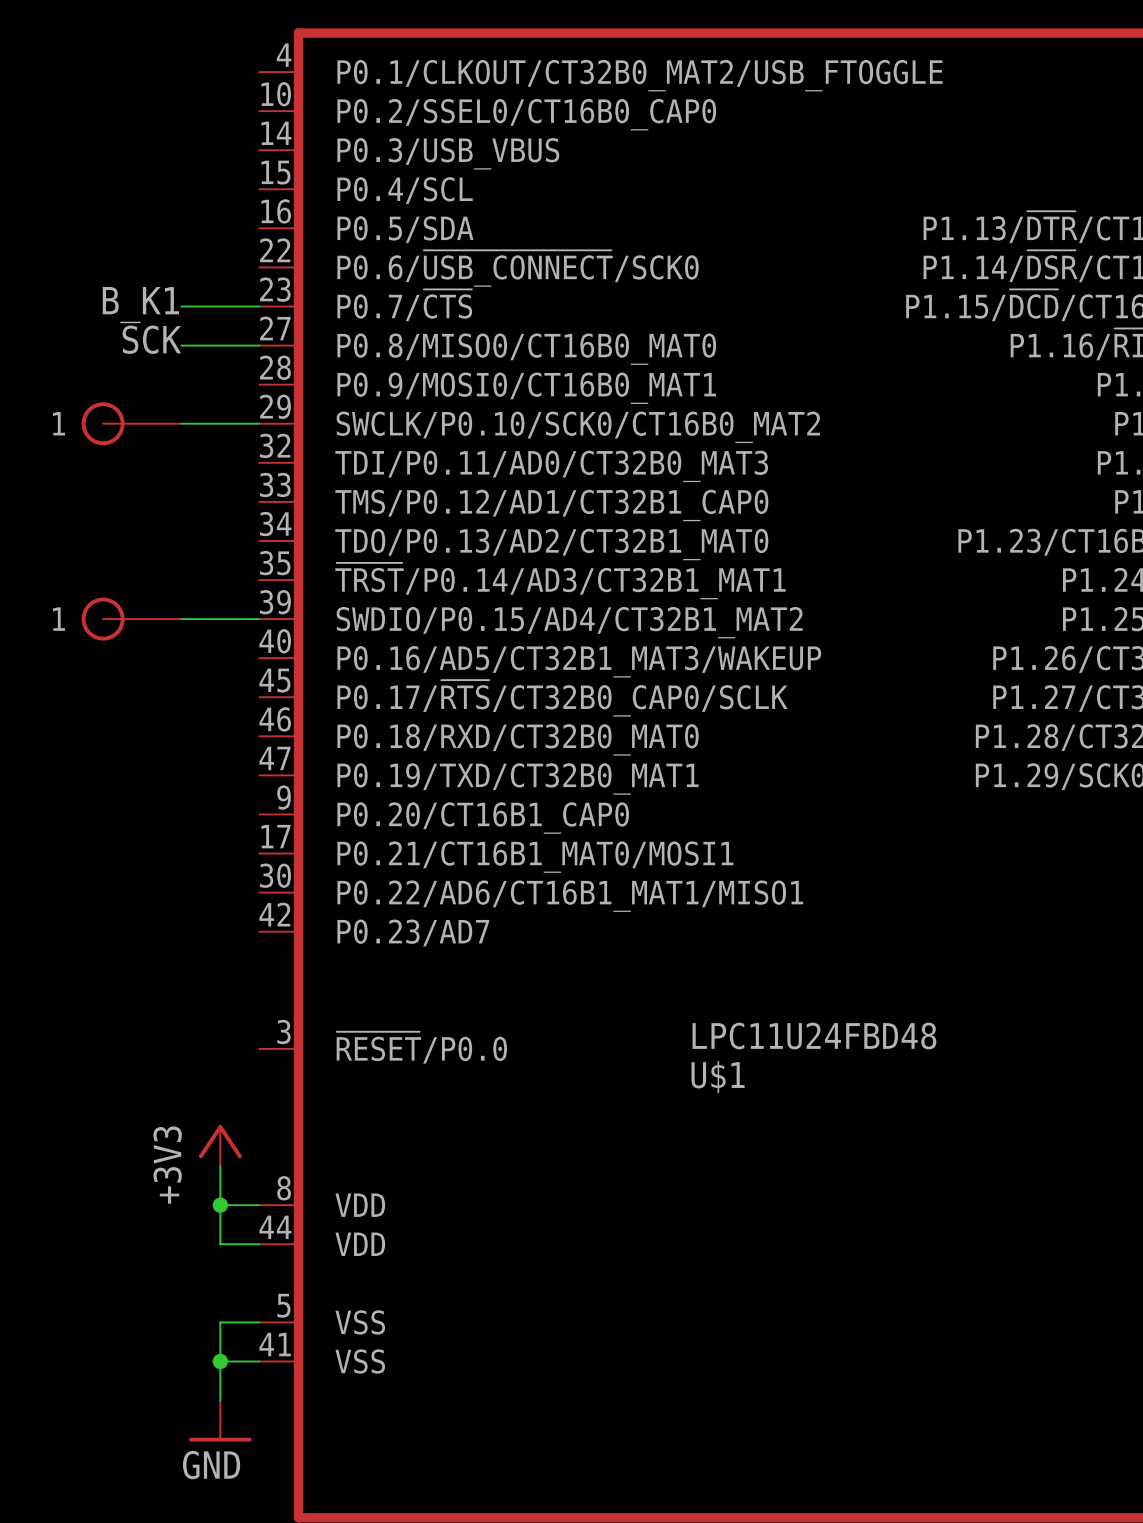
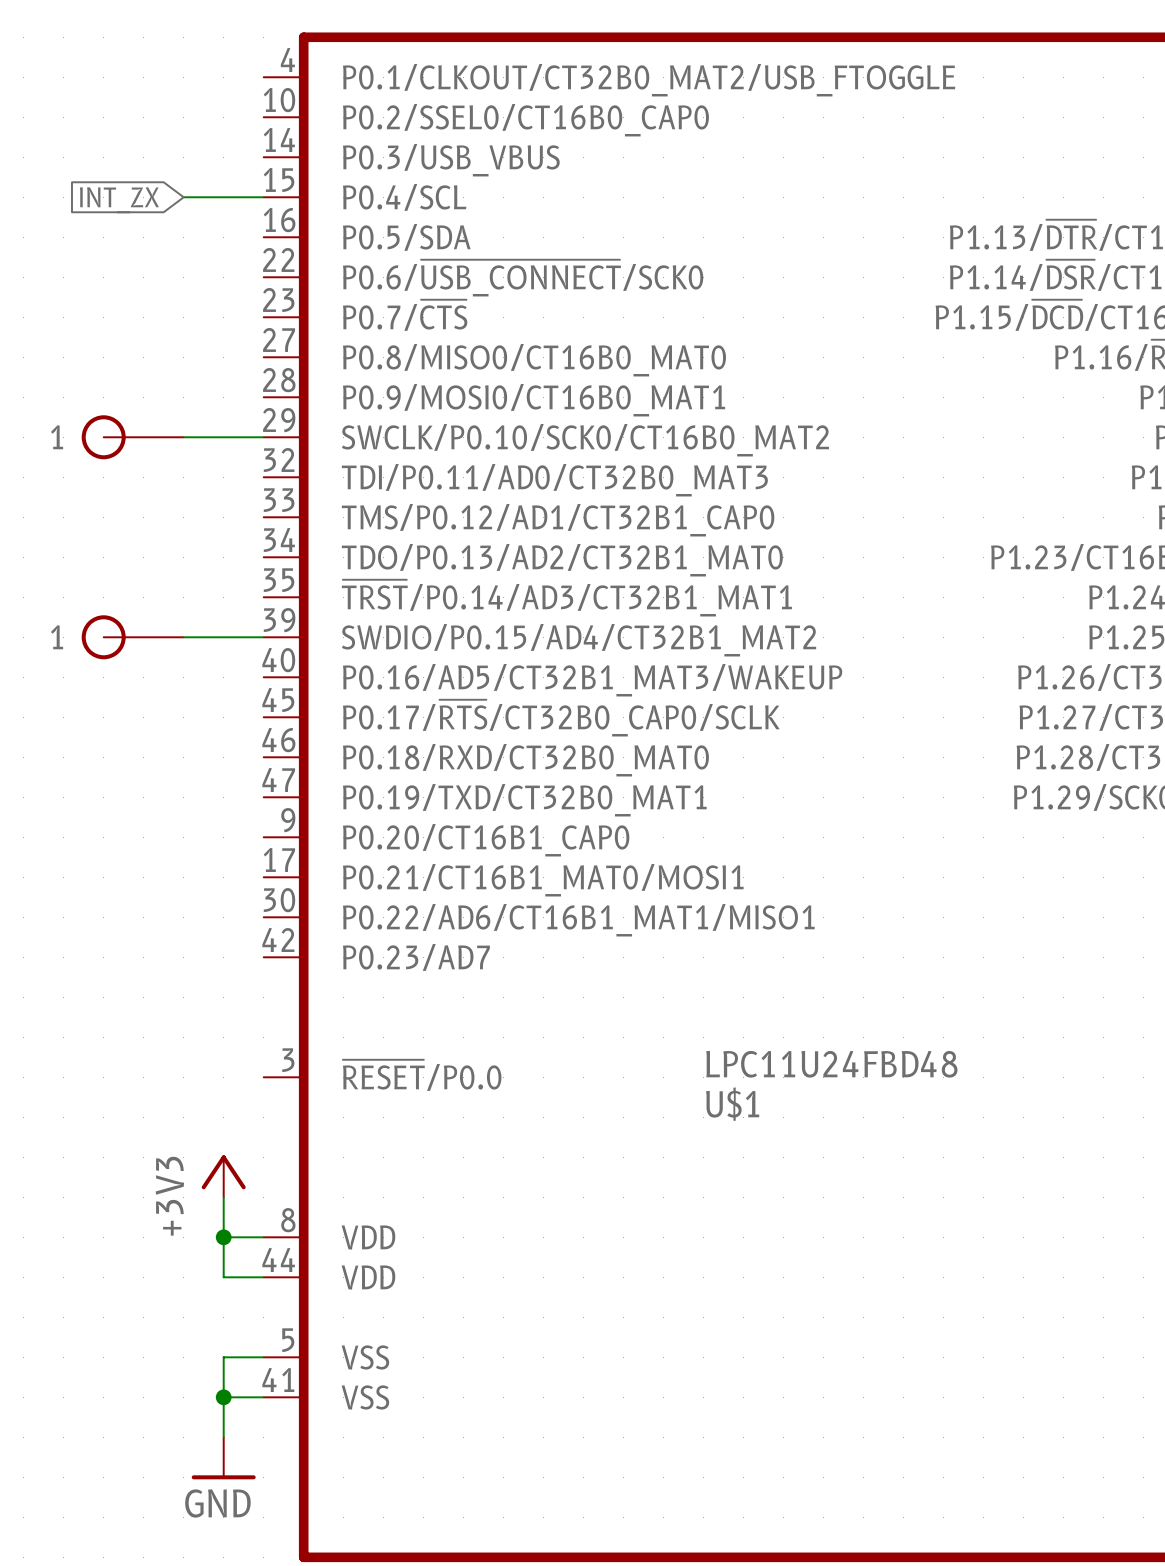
global label: none -> INT_ZX (119, 200)
label: B_K1 (140, 305) -> none
wire: (181, 306) (259, 306) -> (183, 197) (263, 197)
label: SCK (151, 339) -> none
wire: (181, 345) (259, 345) -> none

